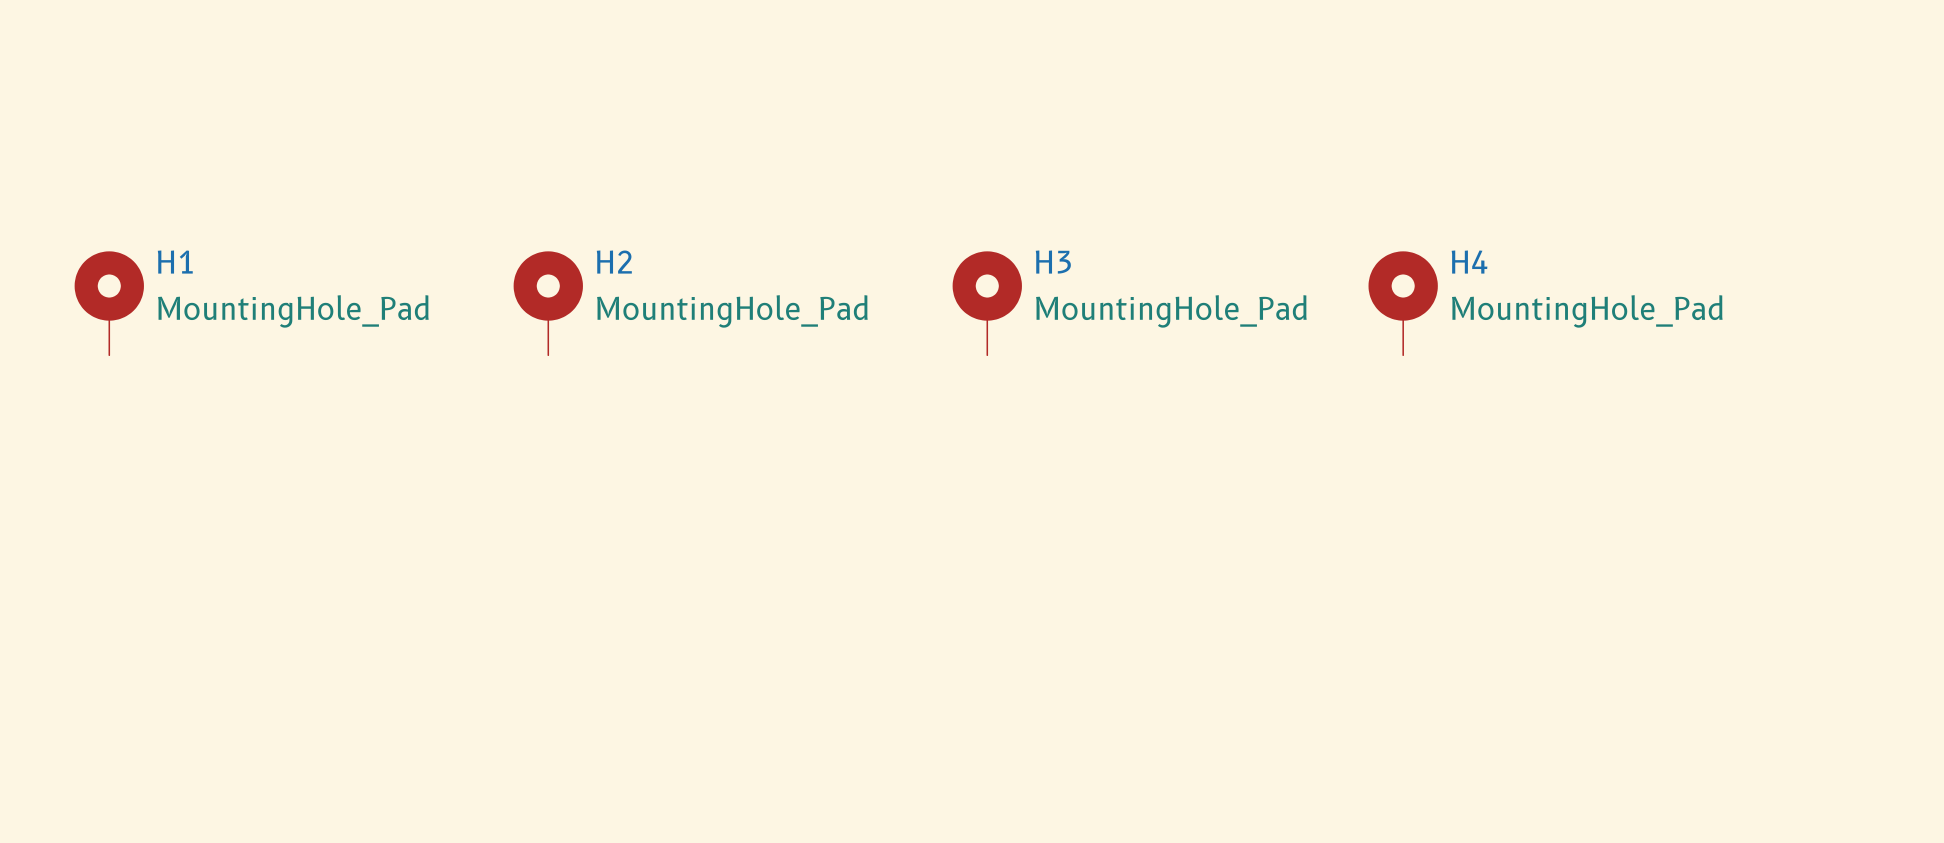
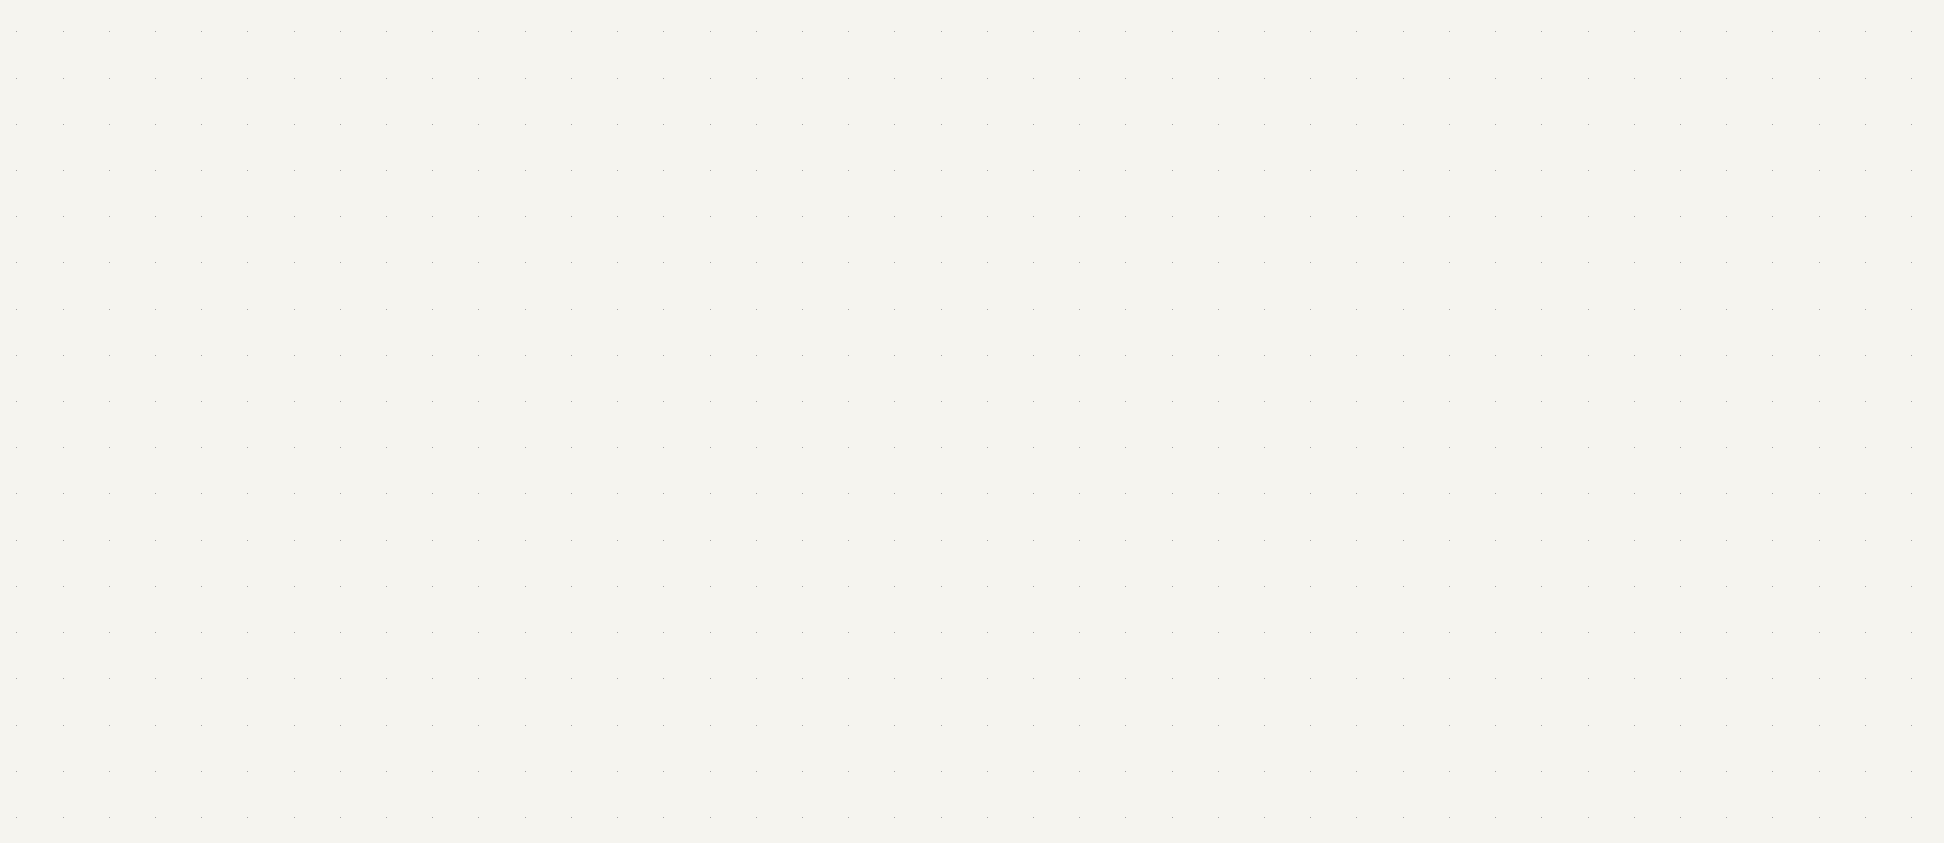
H1: MountingHole_Pad (109, 303) -> none
H2: MountingHole_Pad (548, 303) -> none
H3: MountingHole_Pad (987, 303) -> none
H4: MountingHole_Pad (1403, 303) -> none

